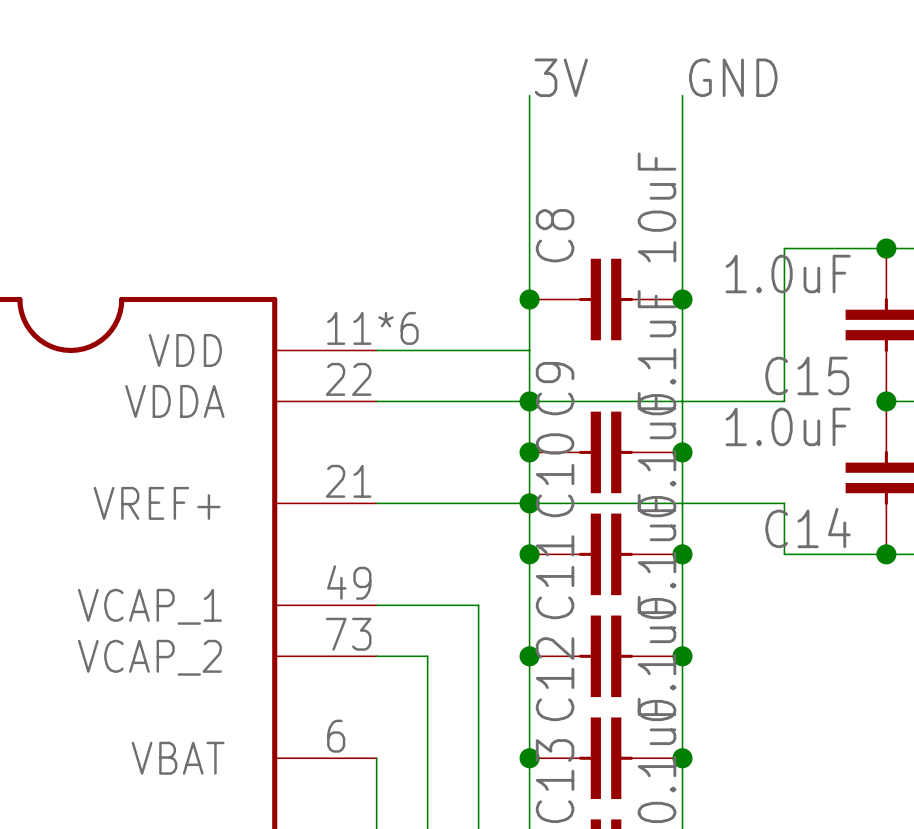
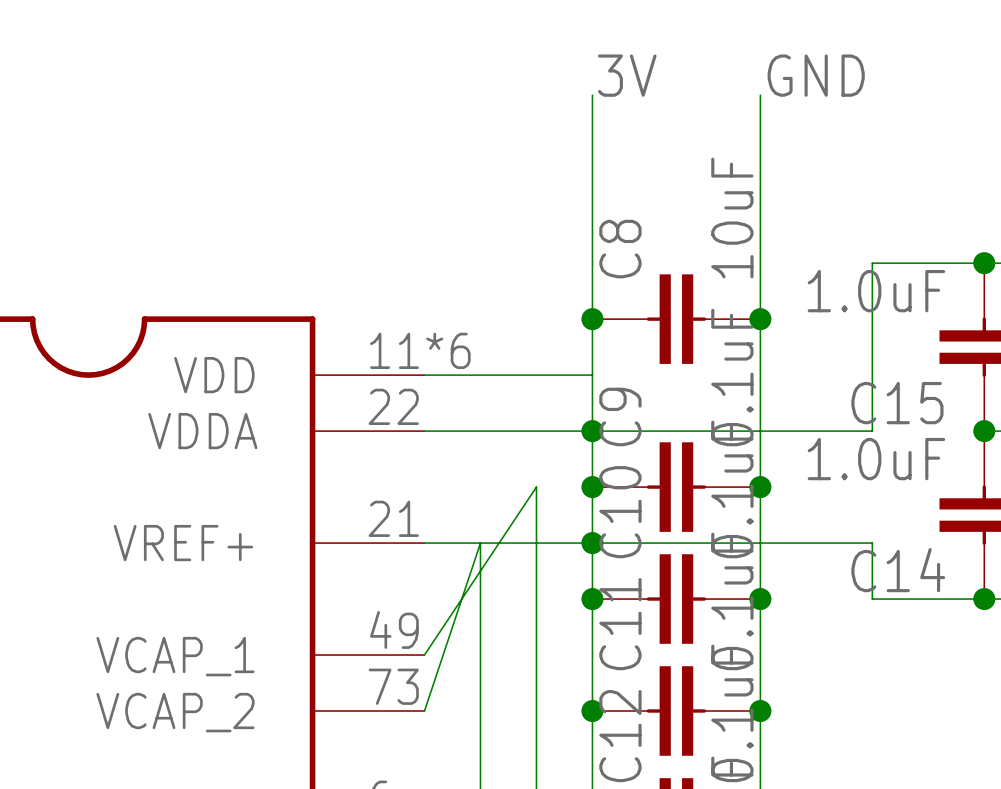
wire: (376, 605) (478, 605) -> (424, 655) (536, 487) (536, 655)
wire: (376, 656) (427, 656) -> (424, 711) (480, 543) (480, 711)

